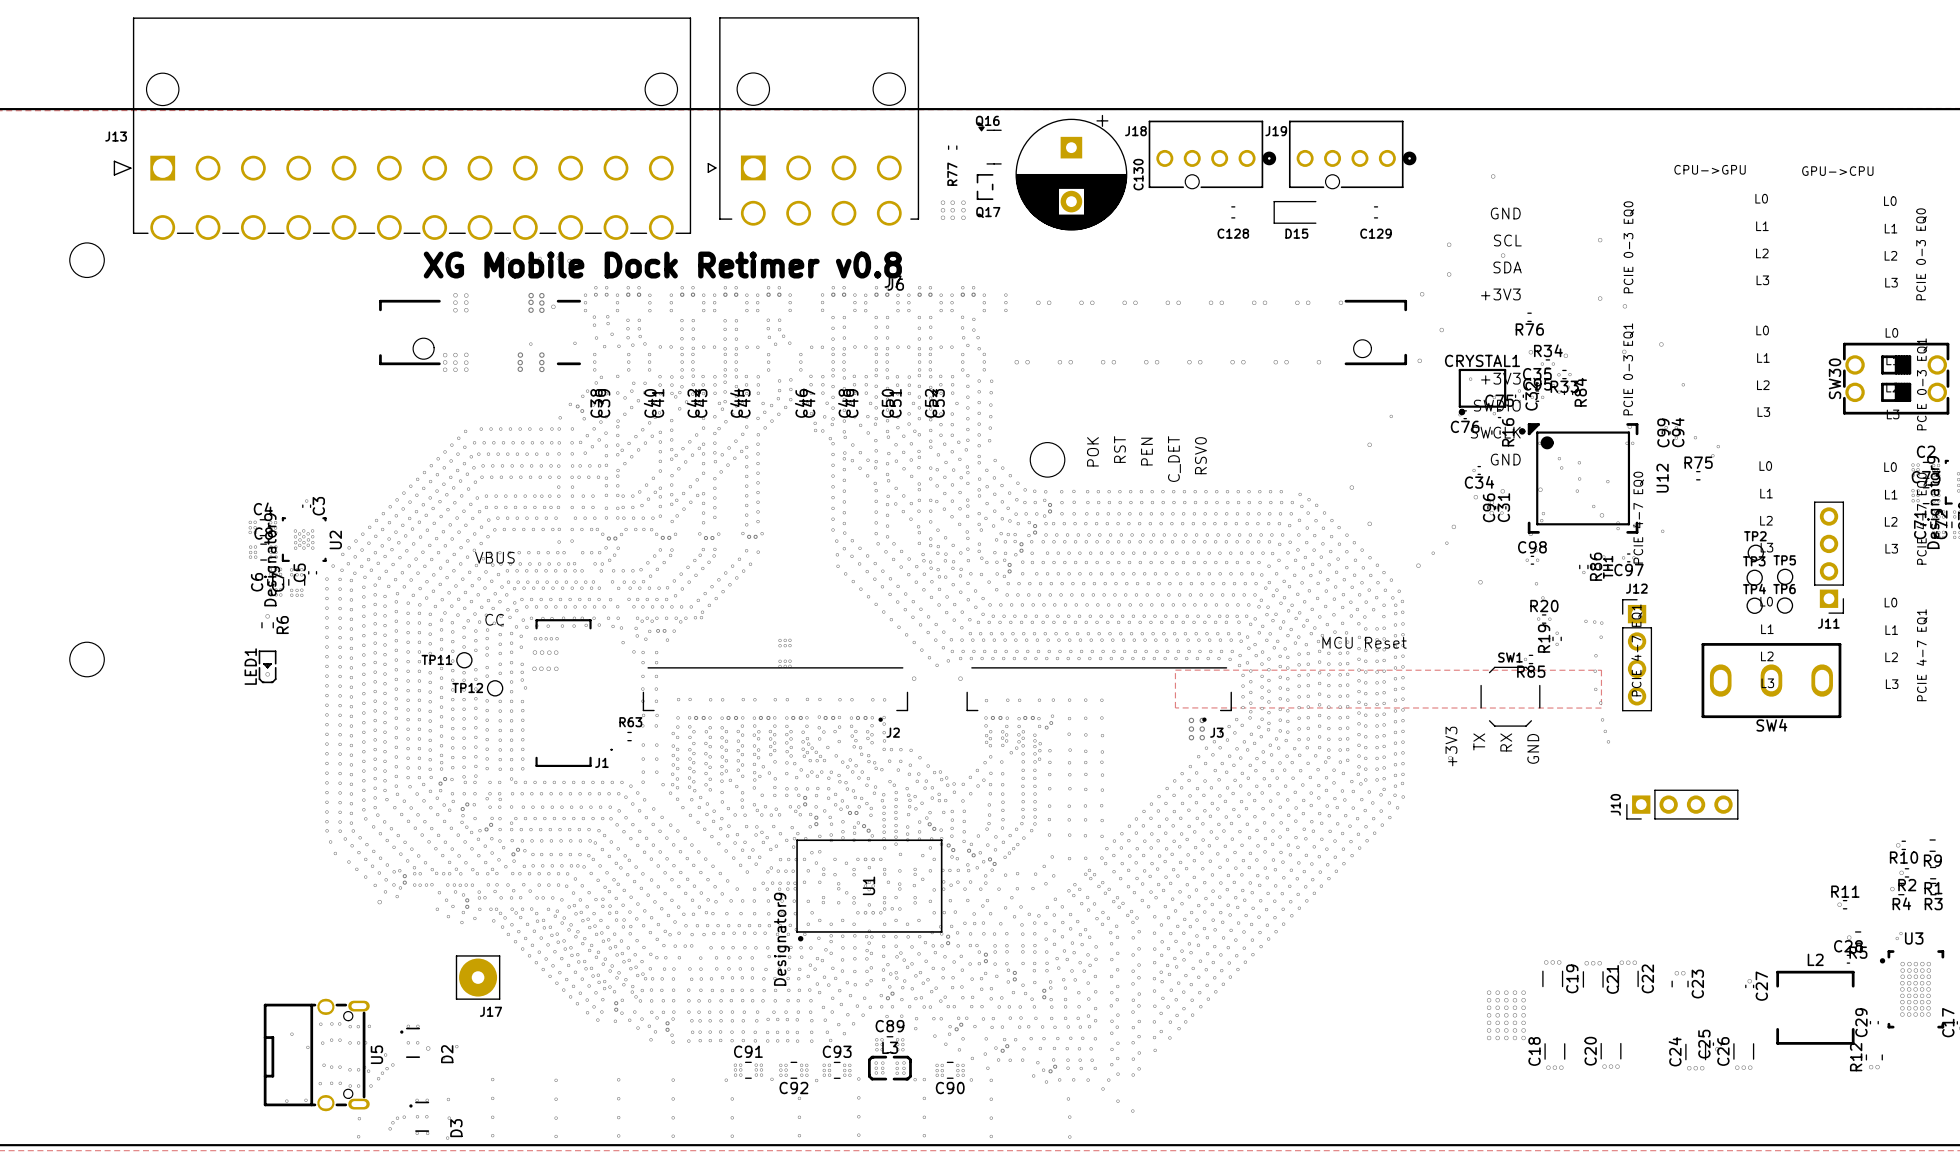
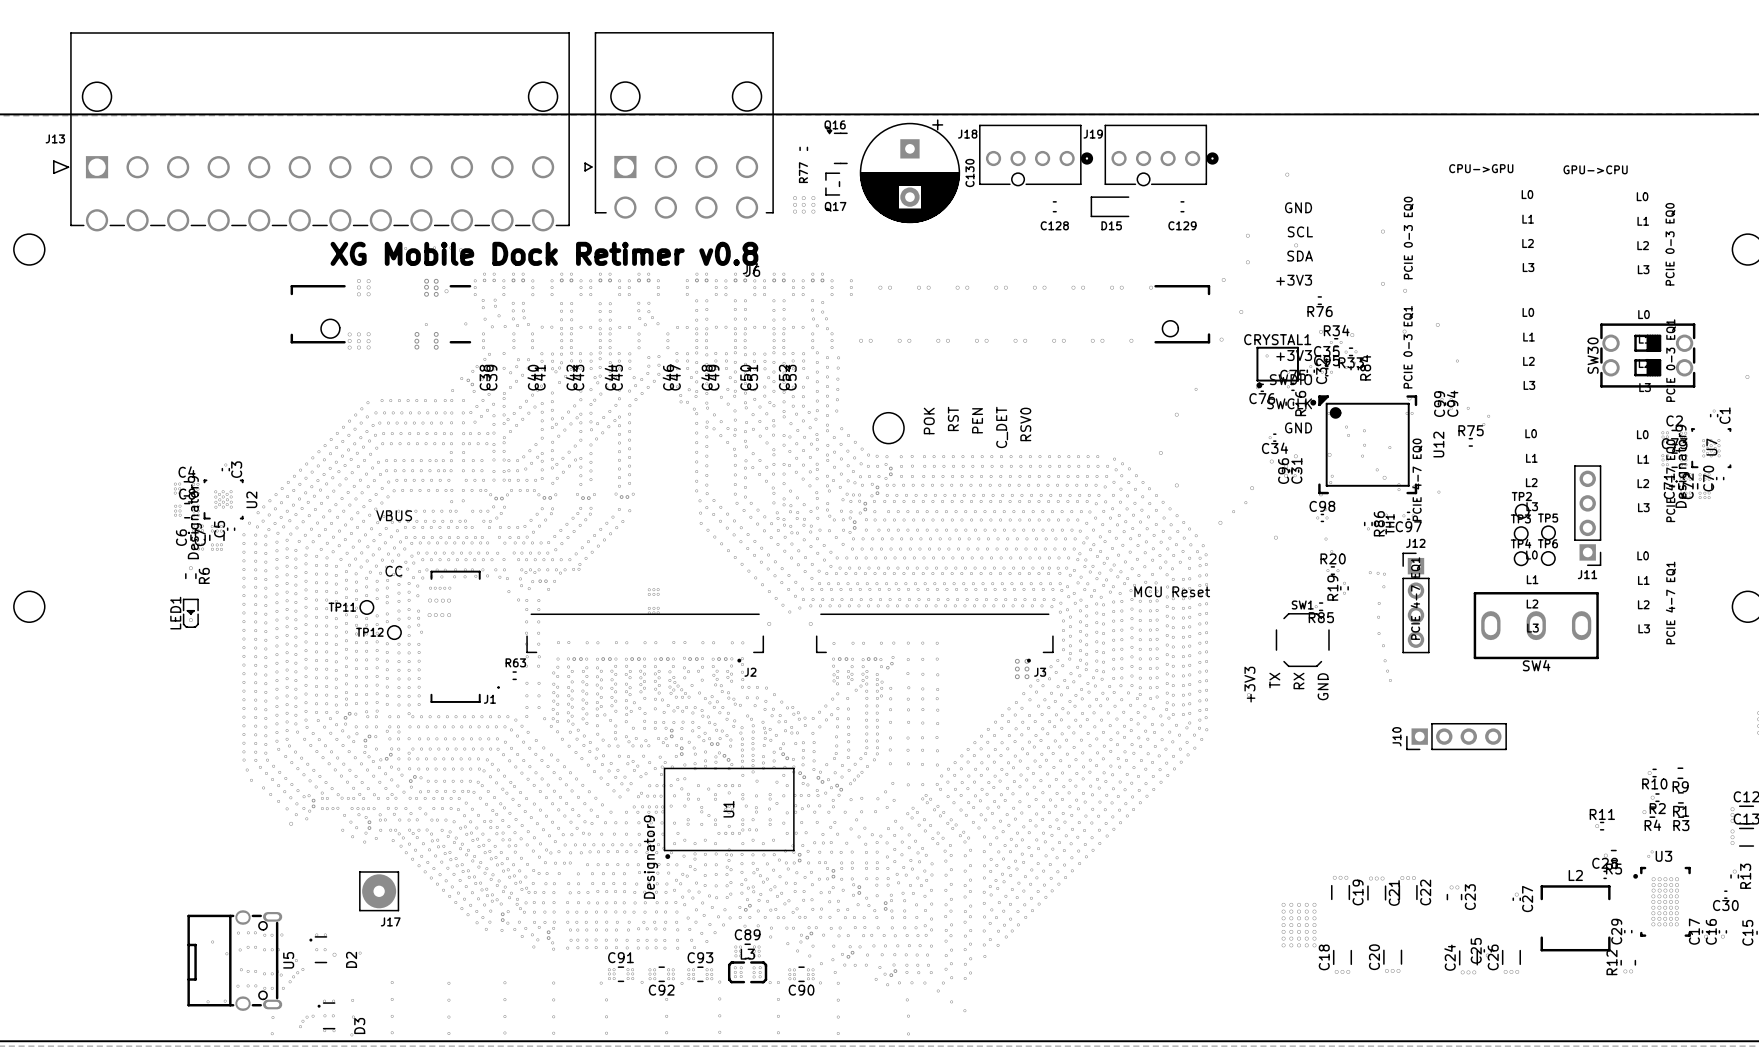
zone outline: (1175, 670) (1175, 707) (1601, 708) (1601, 670) (1175, 670) -> none

